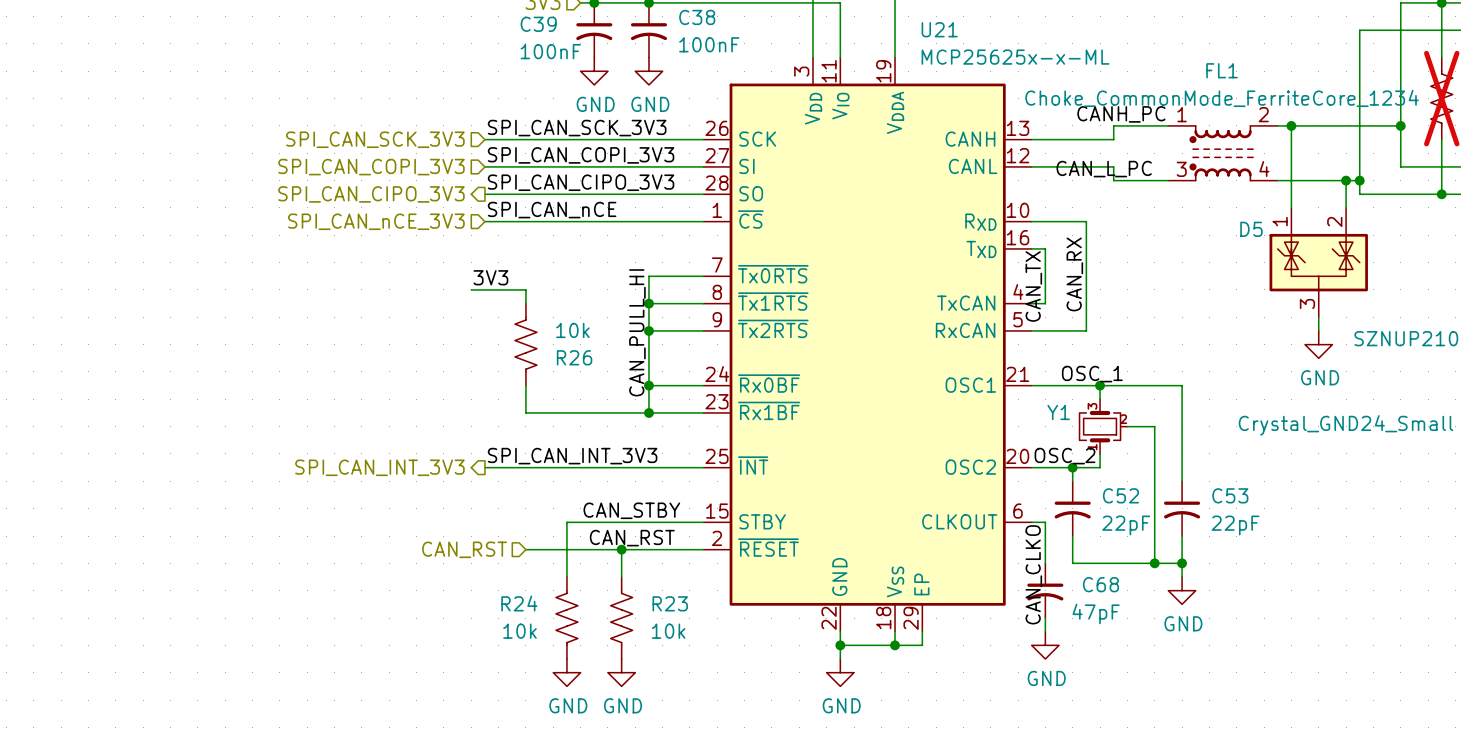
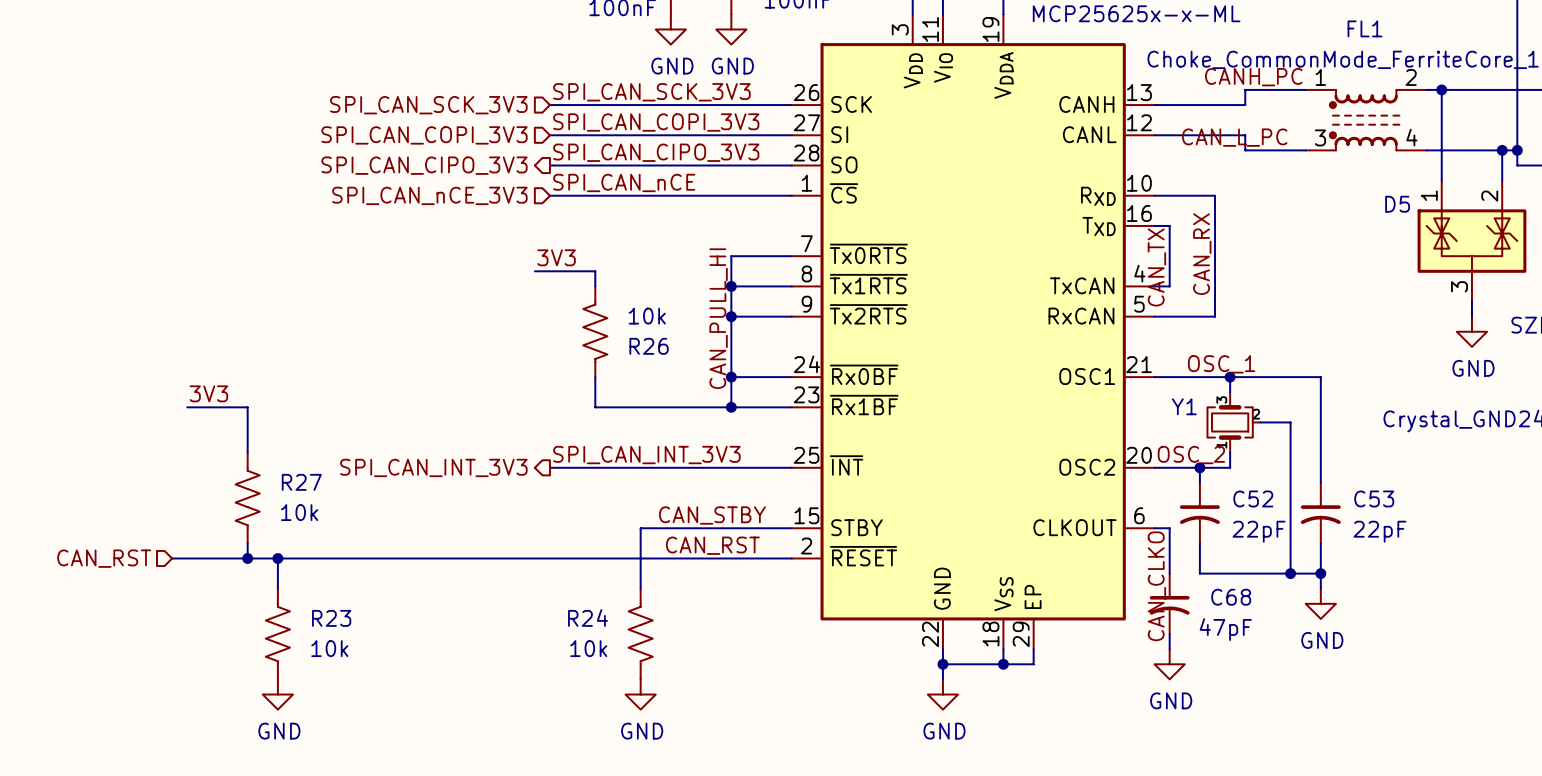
label: none -> 3V3 (208, 393)
wire: none -> (187, 407) (247, 407) (247, 452)
R27: none -> 10k (247, 498)
wire: none -> (247, 543) (247, 558)
hierarchical label: none -> CAN_RST (104, 558)
wire: none -> (172, 558) (595, 558)
junction: none -> (247, 558)
wire: none -> (277, 558) (277, 588)
junction: none -> (277, 558)
hierarchical label: CAN_RST (464, 549) -> none
wire: (621, 549) (621, 577) -> none
junction: (621, 549) -> none
R23 position: (621, 618) -> (277, 634)
power symbol: none -> GND (277, 694)
power symbol: GND (621, 672) -> none

